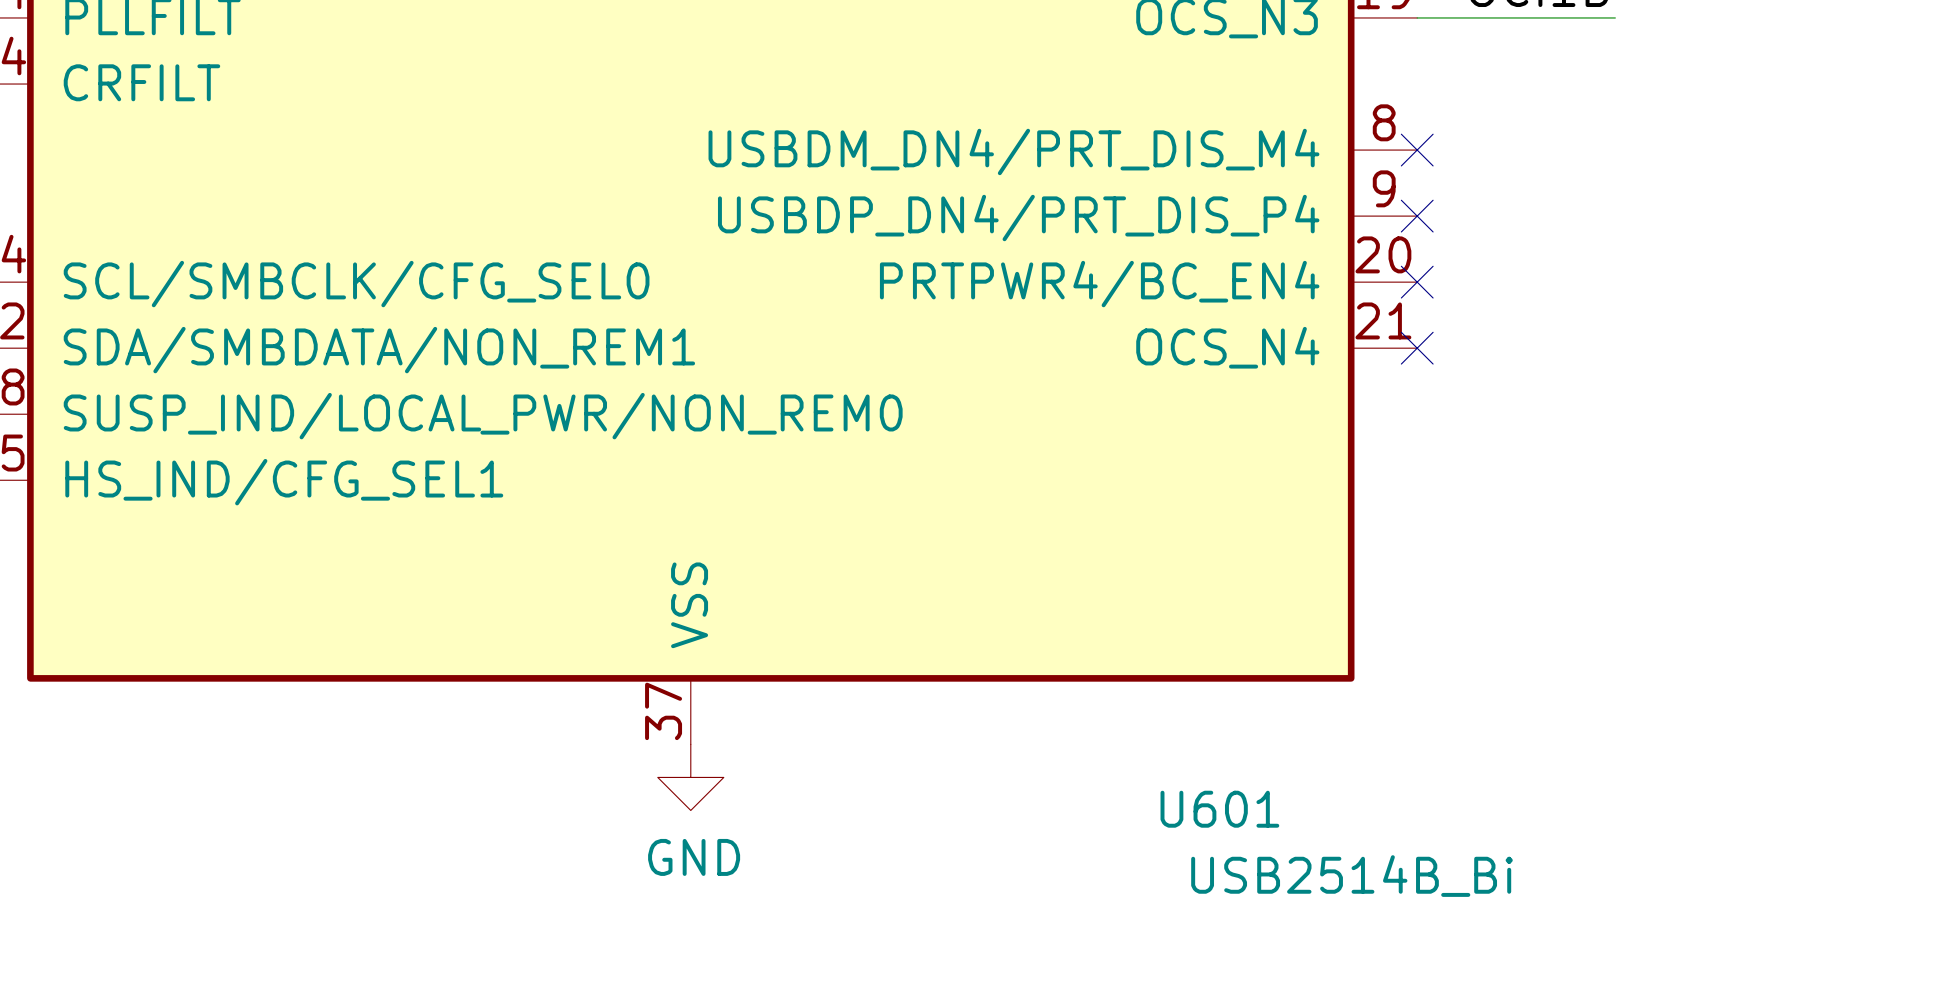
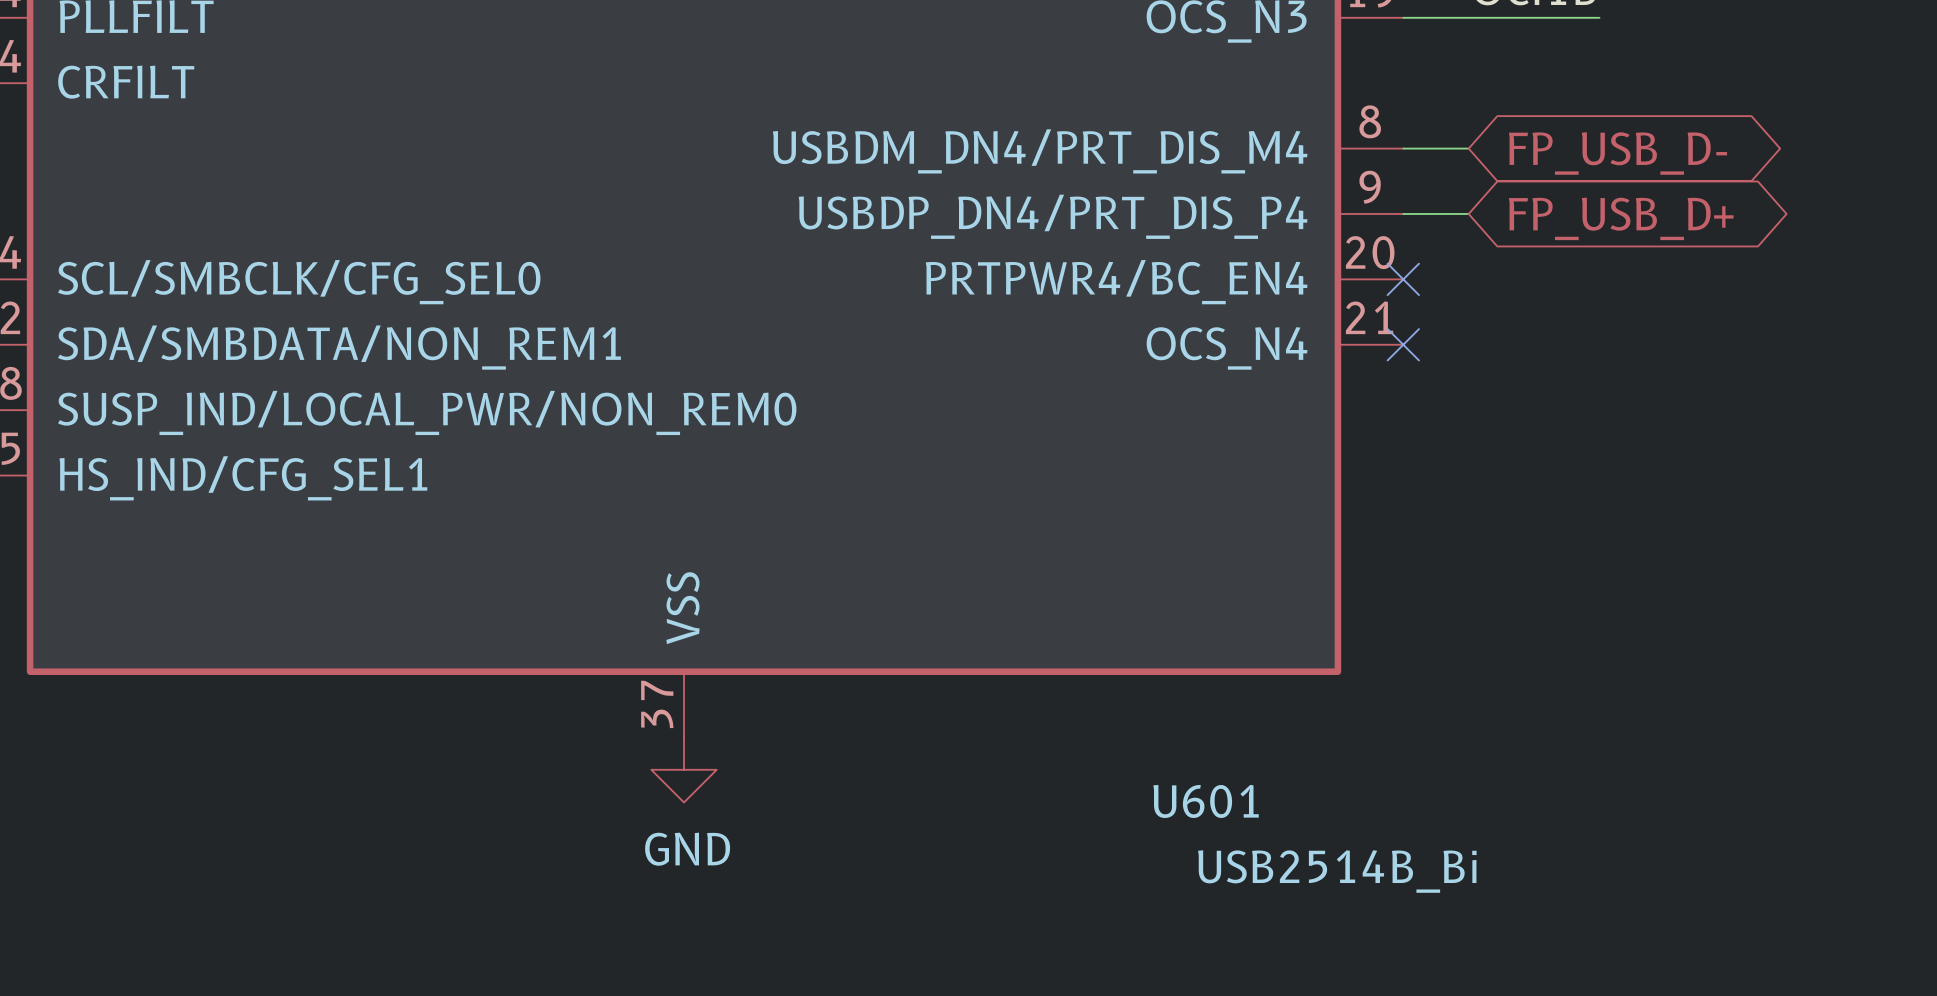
wire: none -> (1403, 148) (1468, 148)
no-connect mark: (1417, 150) -> none
global label: none -> FP_USB_D- (1617, 153)
wire: none -> (1403, 213) (1468, 213)
no-connect mark: (1417, 216) -> none
global label: none -> FP_USB_D+ (1621, 218)

